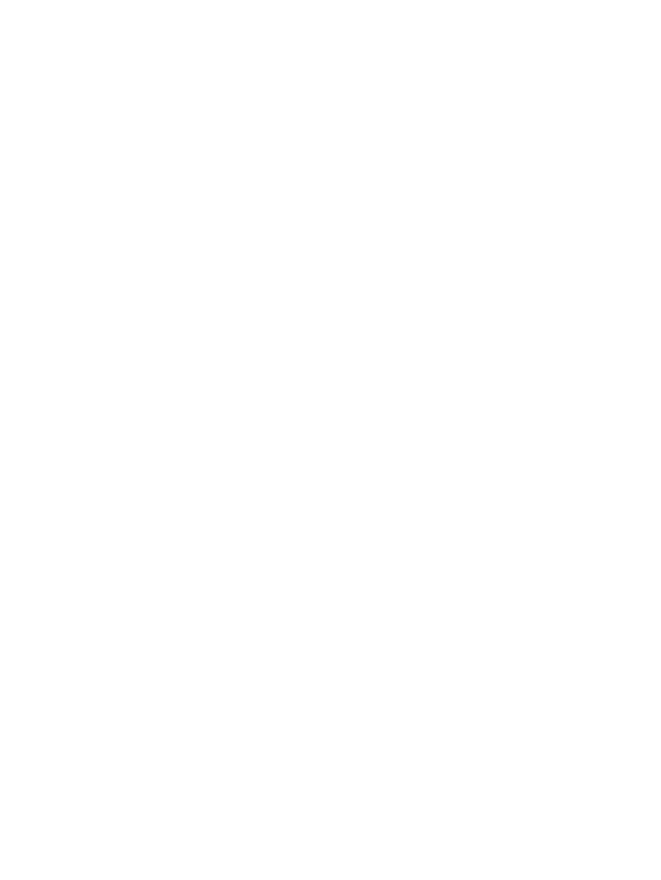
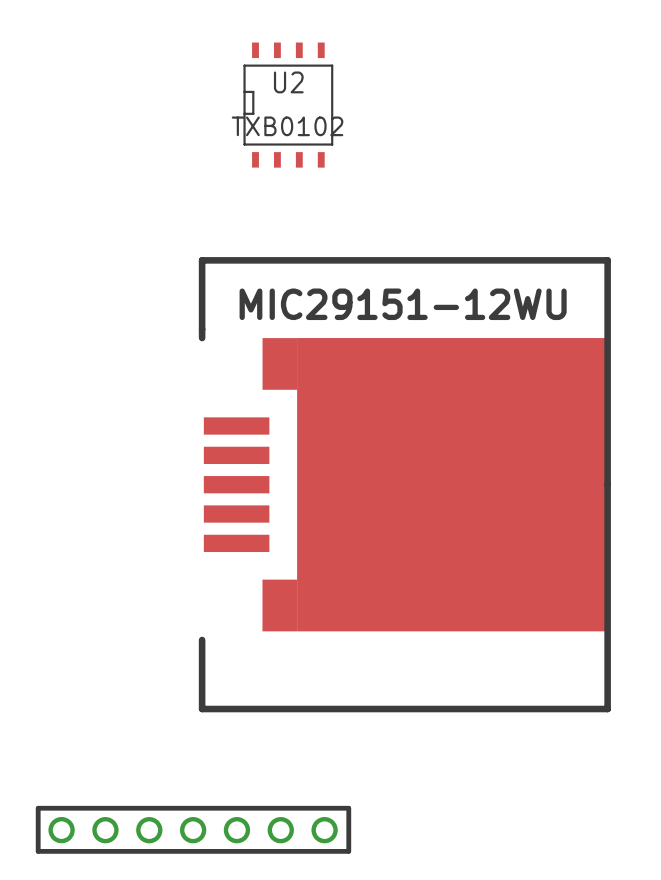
U2: none -> TXB0102 (288, 105)
part: none -> MIC29151-12WU (404, 484)
part: none -> (193, 829)

